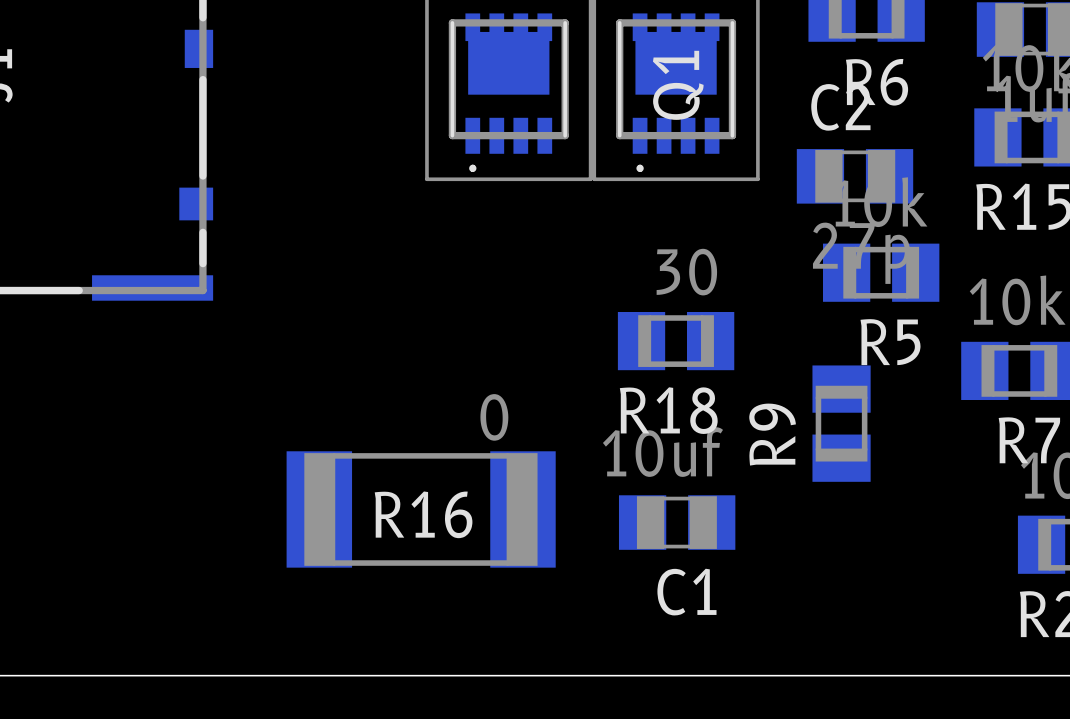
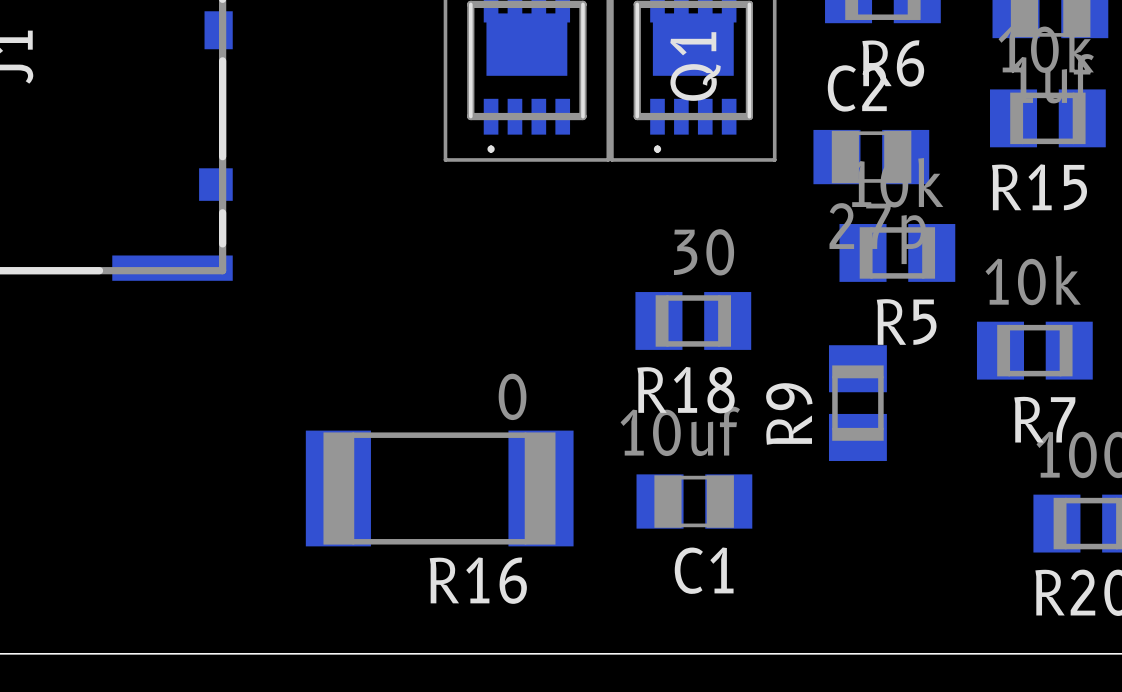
R16 name position: R16 (423, 514) -> R16 (478, 580)

